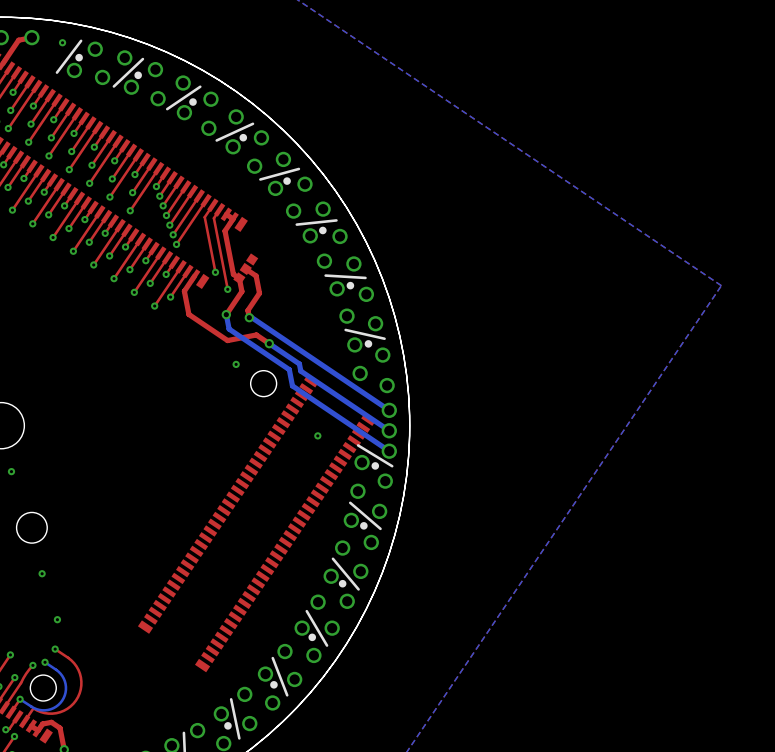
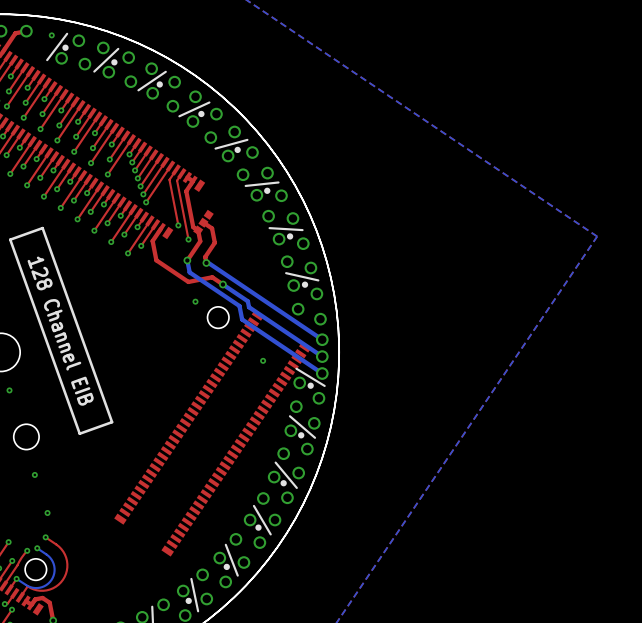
line: none -> (42, 228) (10, 239) (79, 433) (112, 422) (42, 228)
text: none -> 128 Channel EIB (60, 331)

